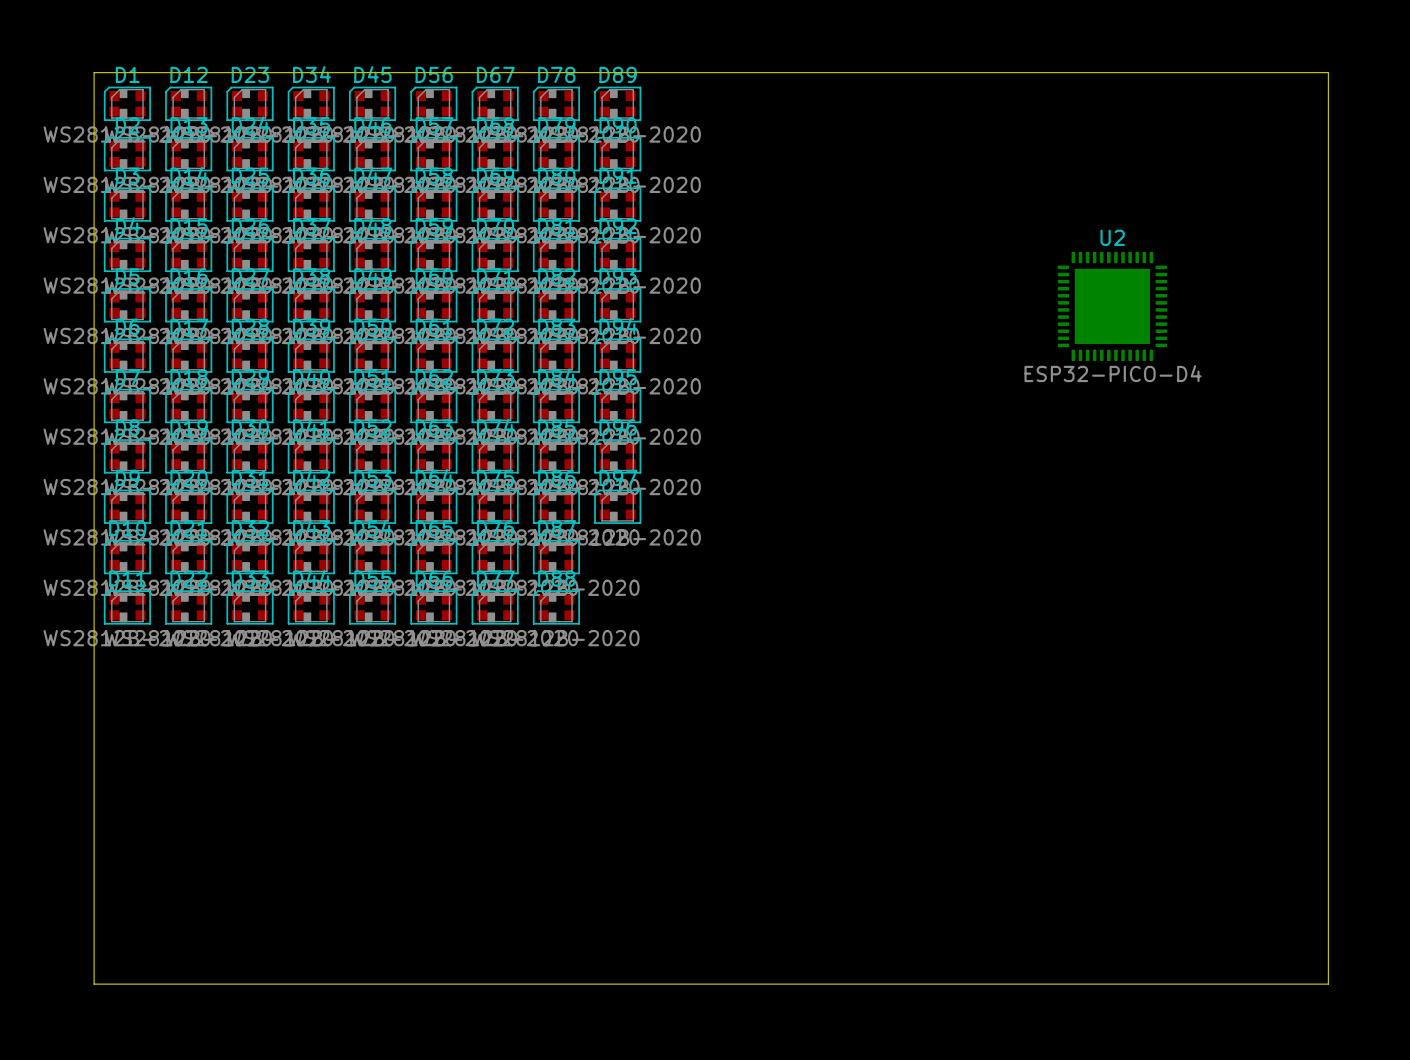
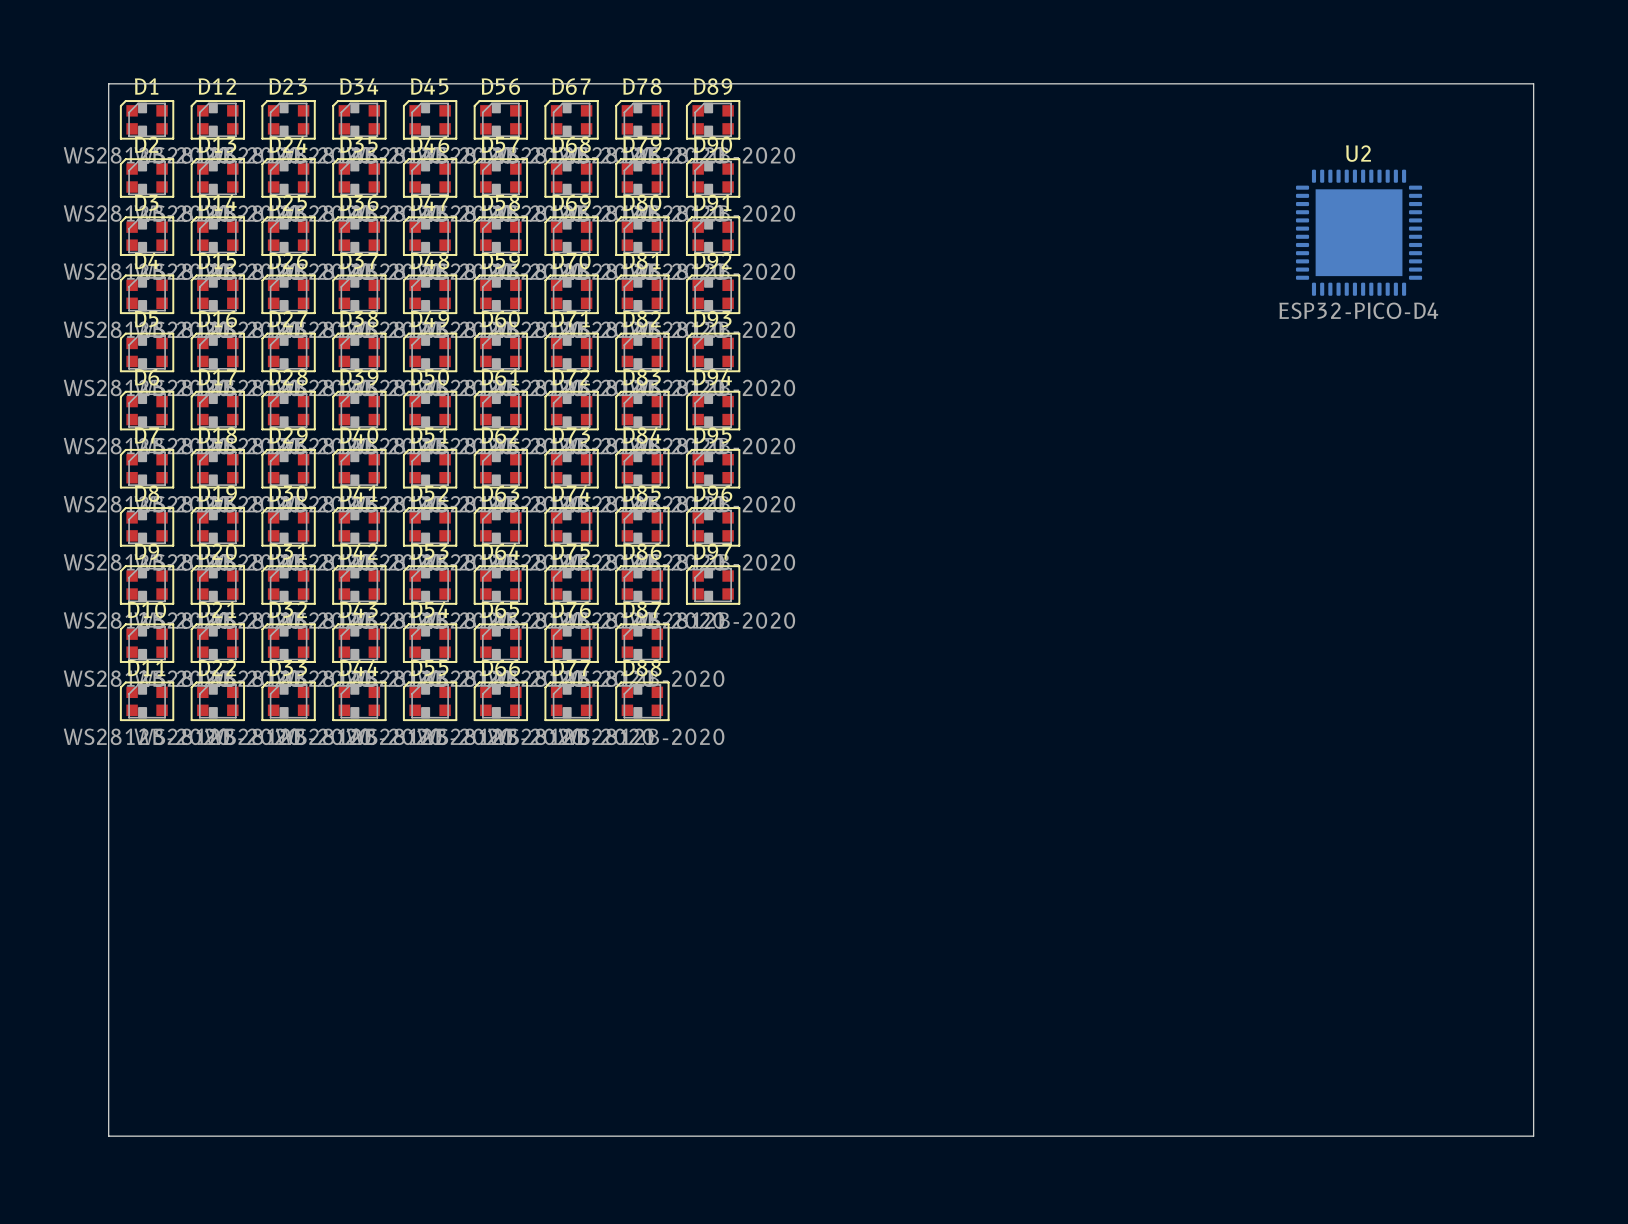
U2 position: (1112, 306) -> (1359, 232)

